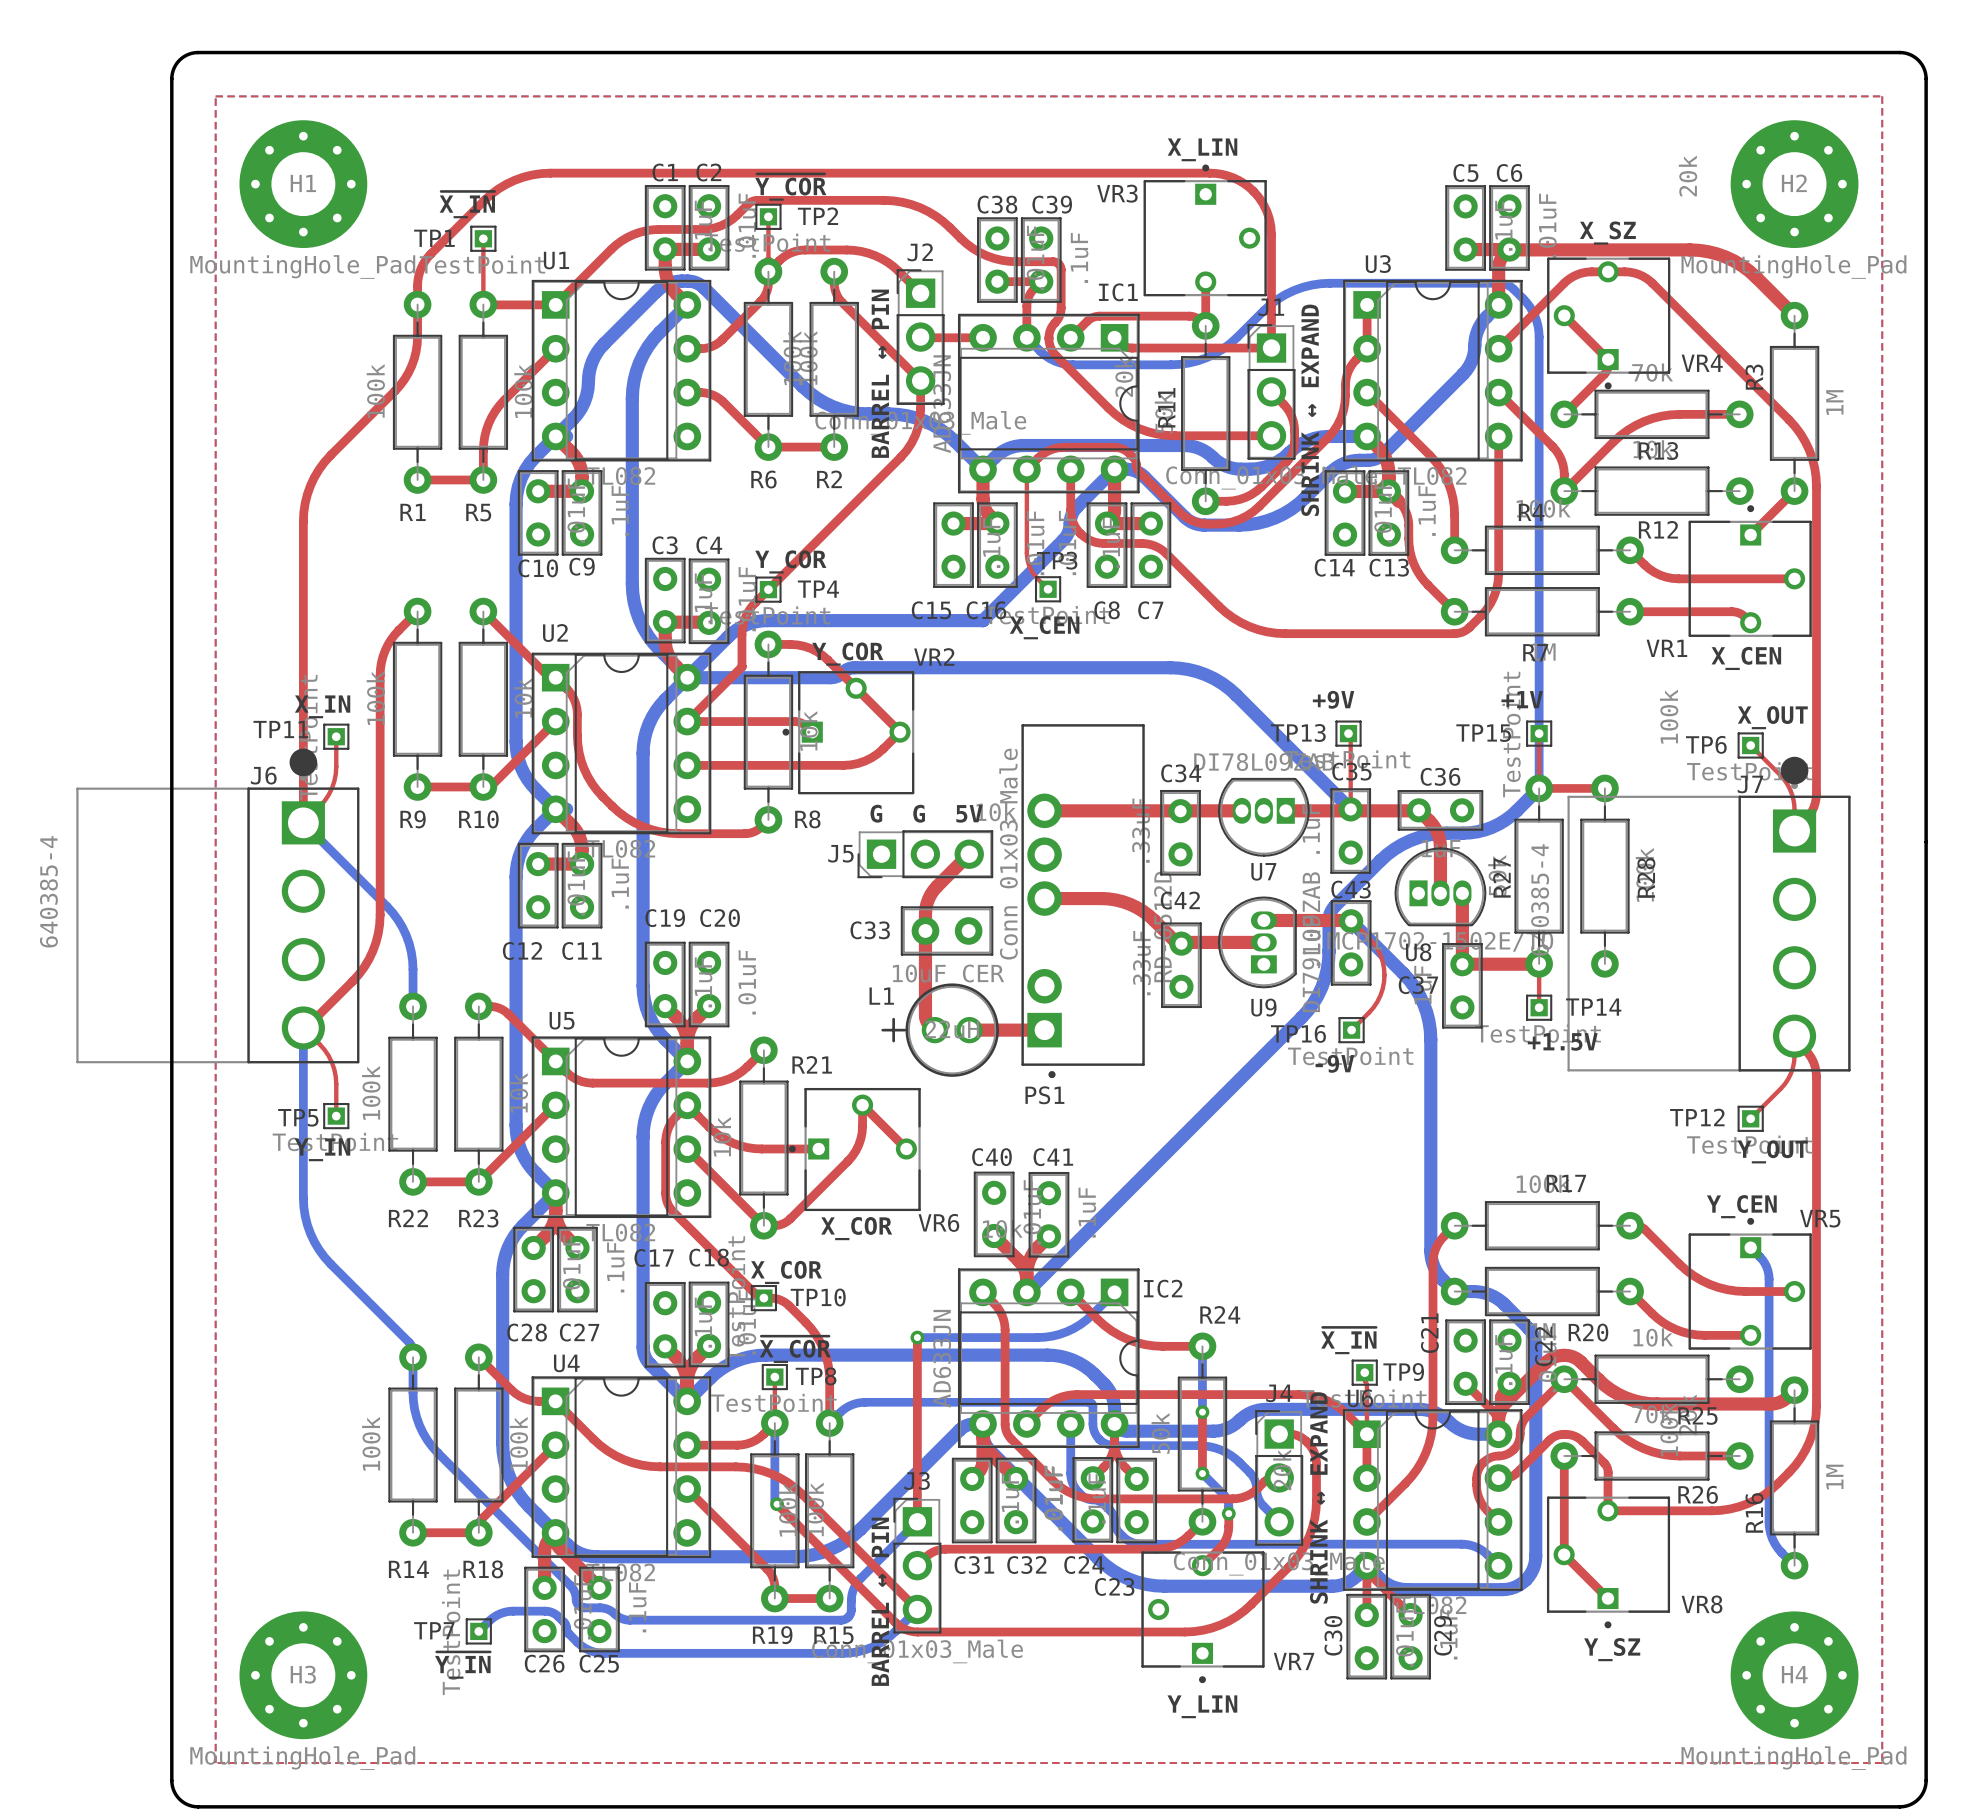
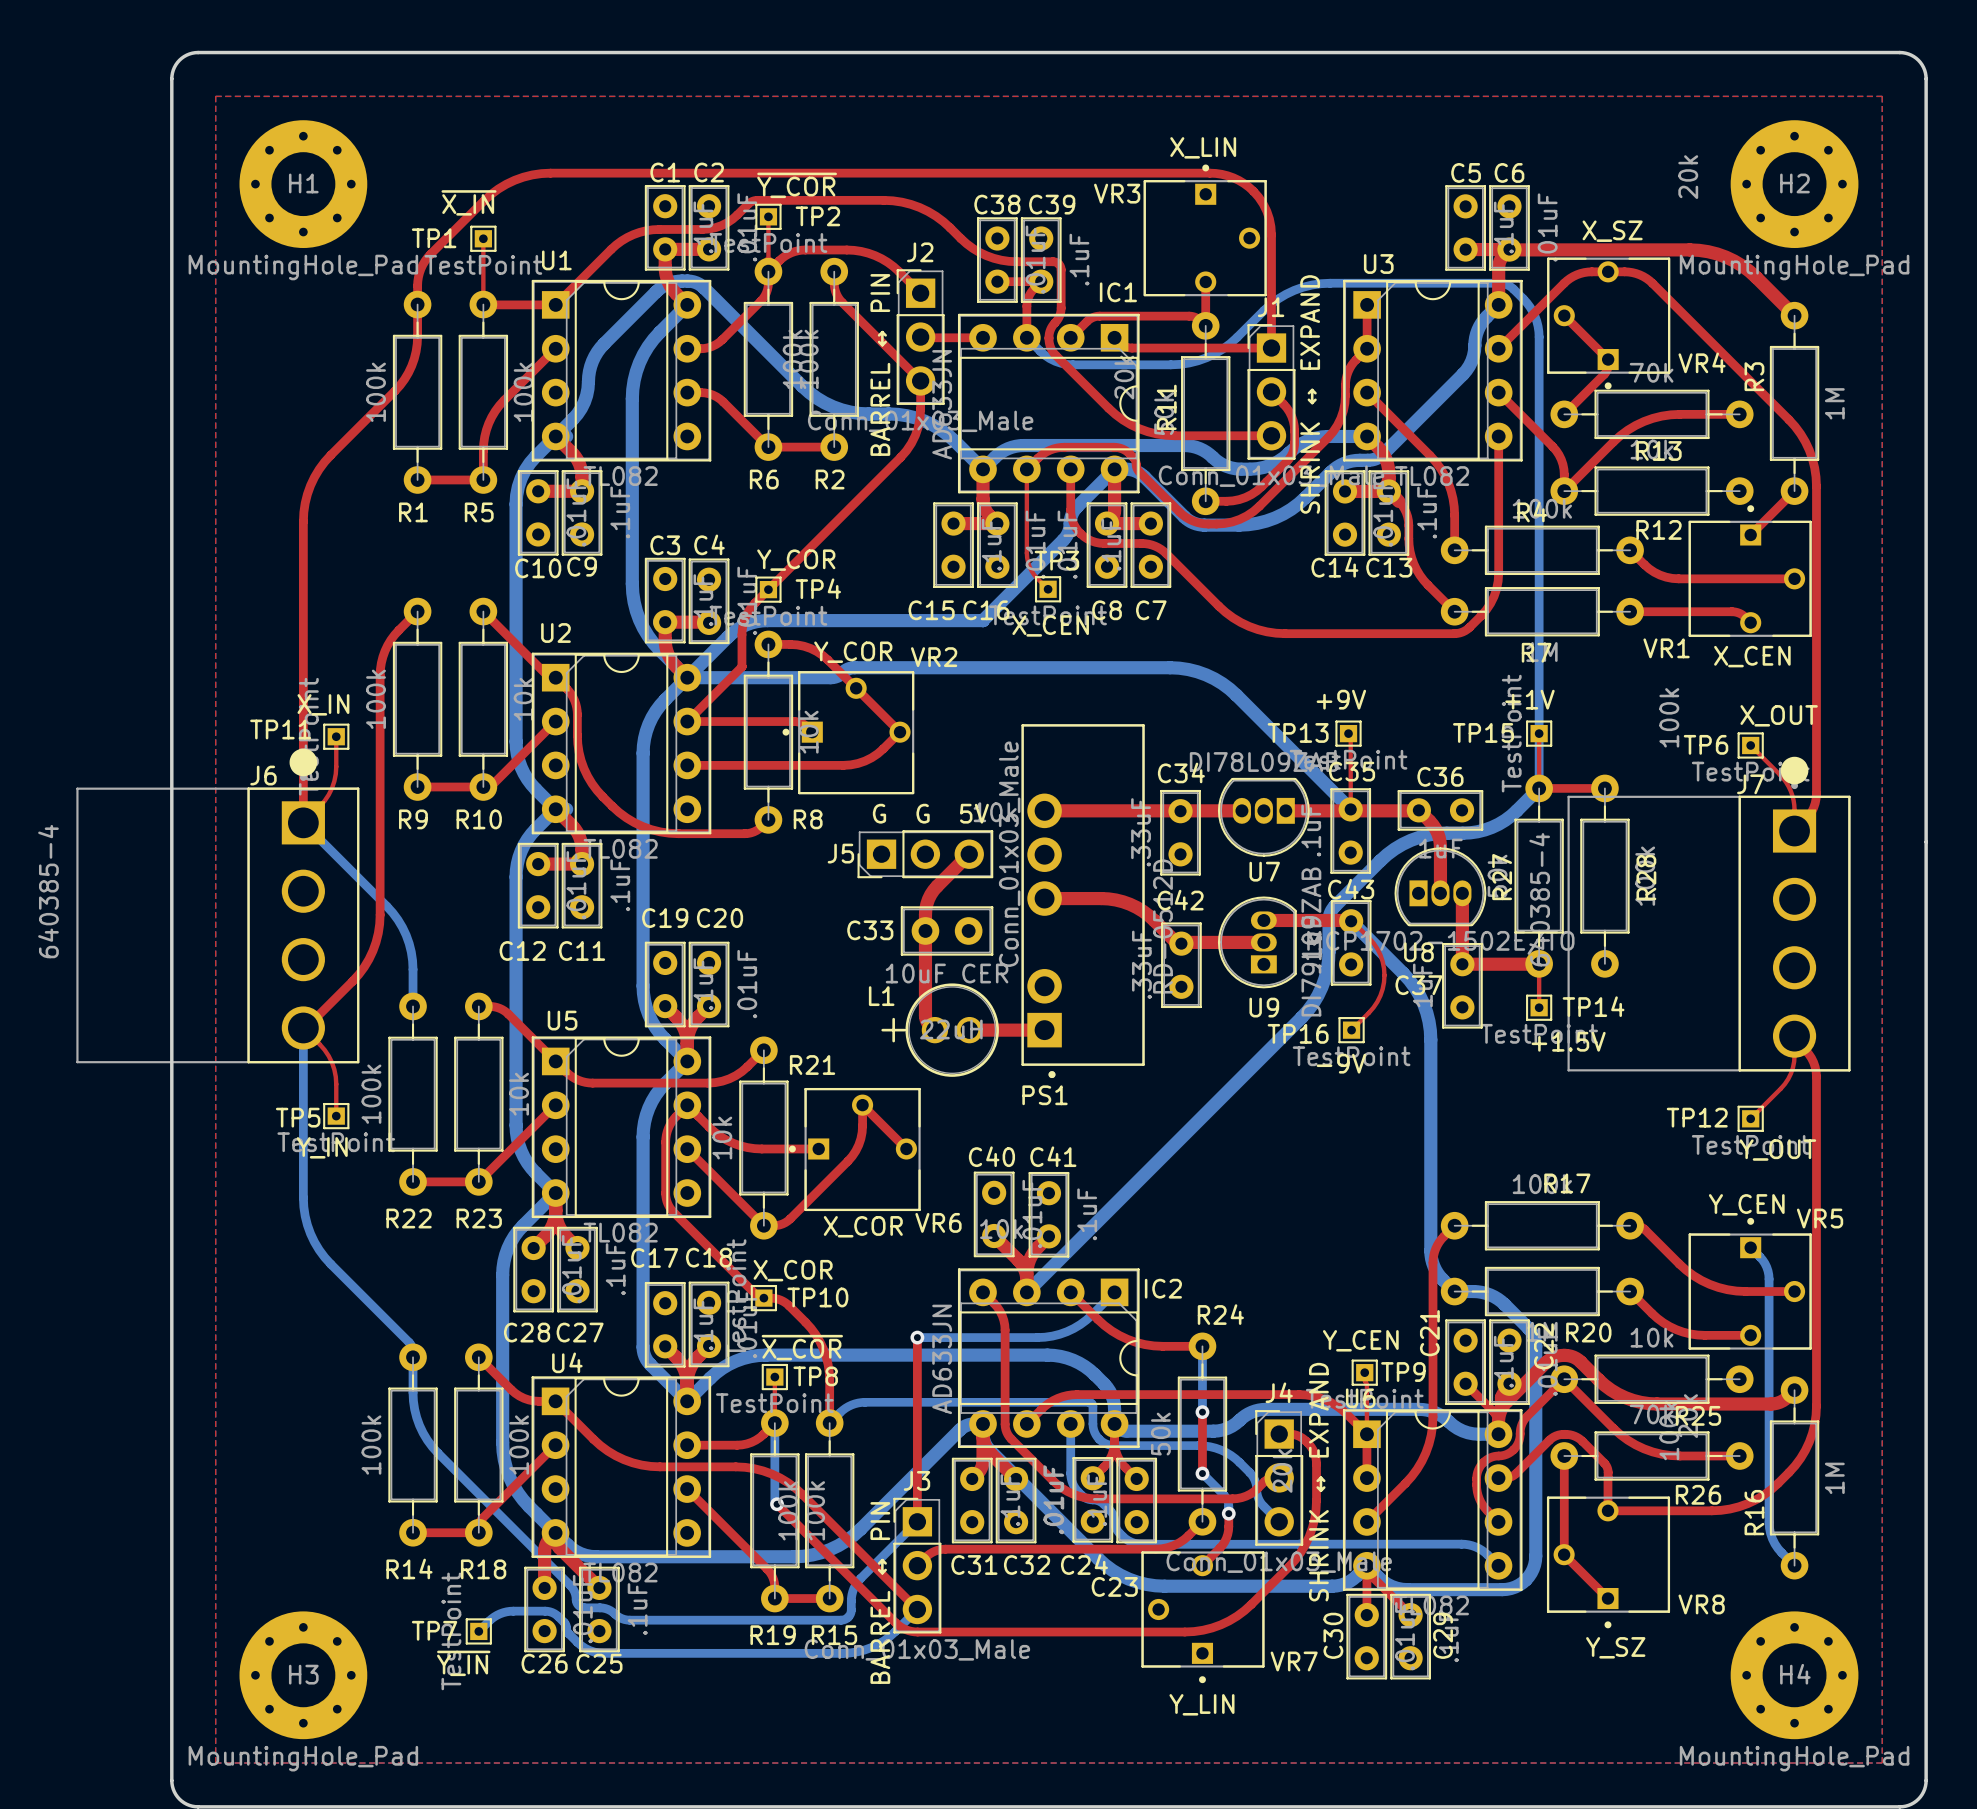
text: ~{X_IN} (1348, 1340) -> Y_CEN (1360, 1340)

